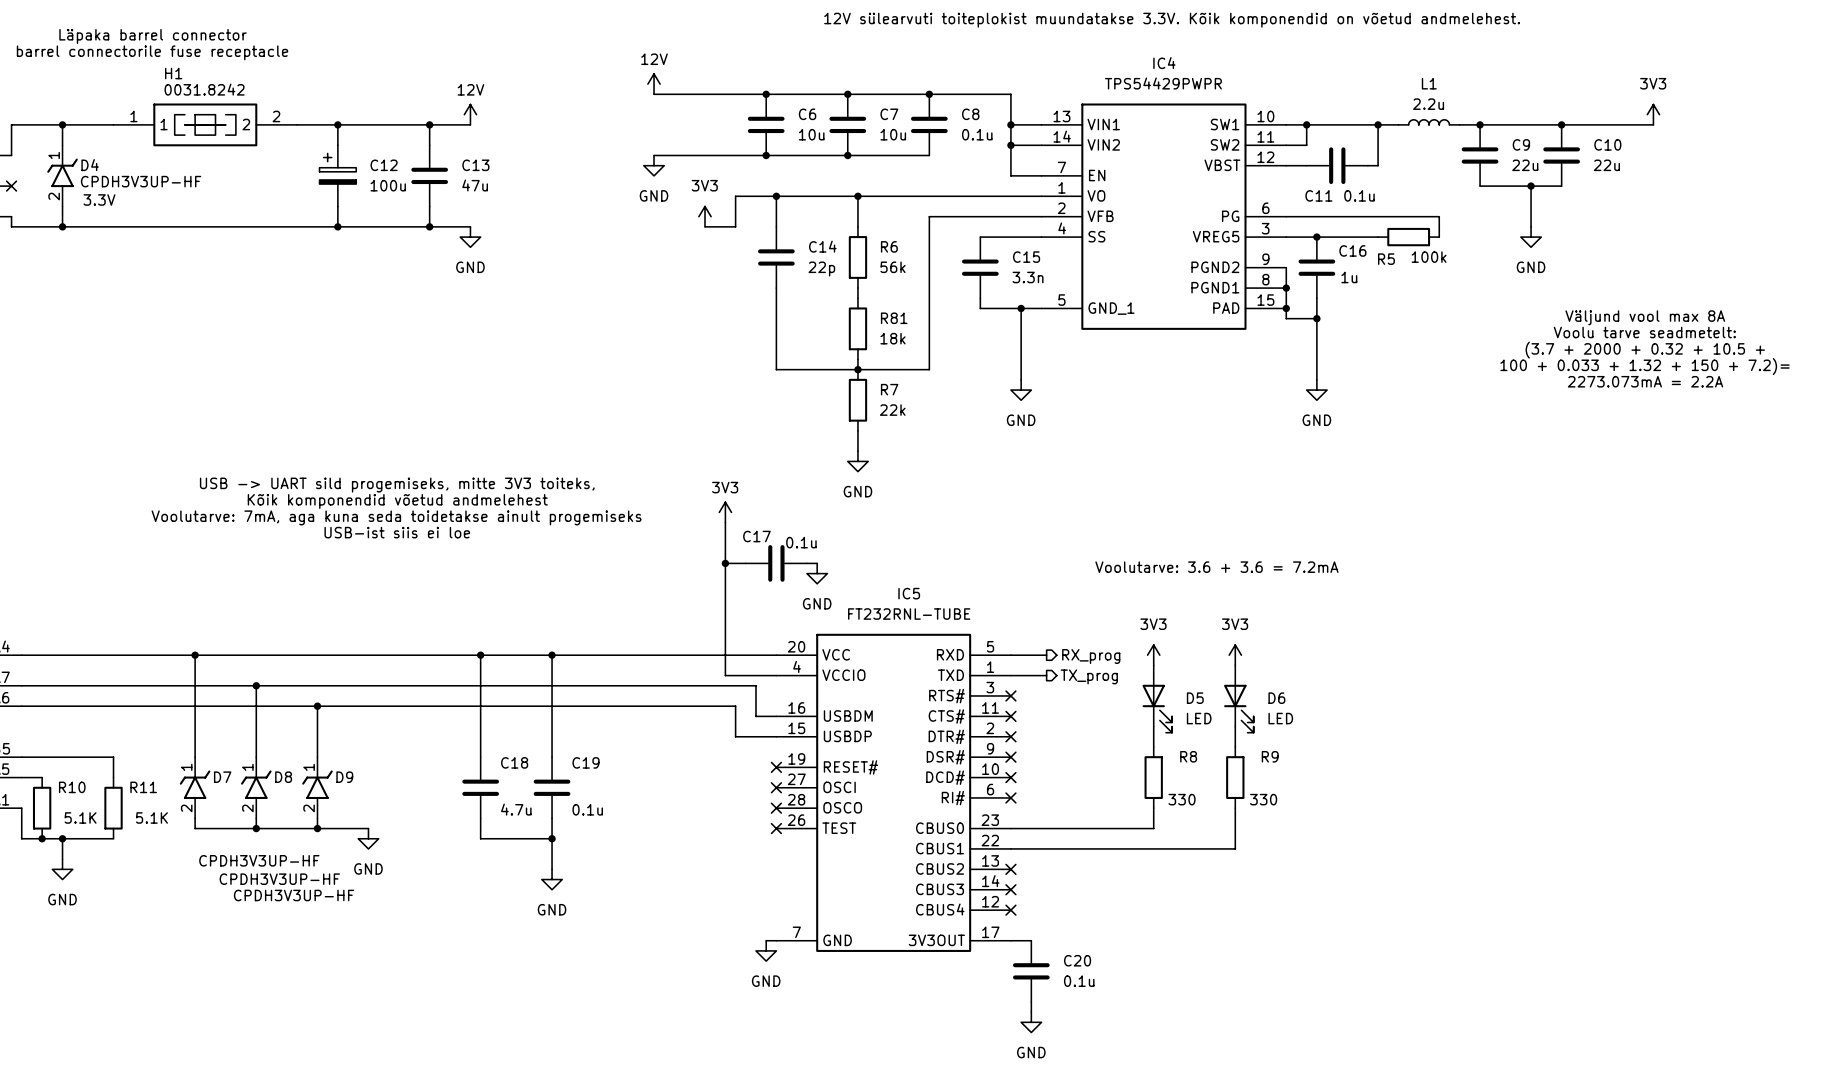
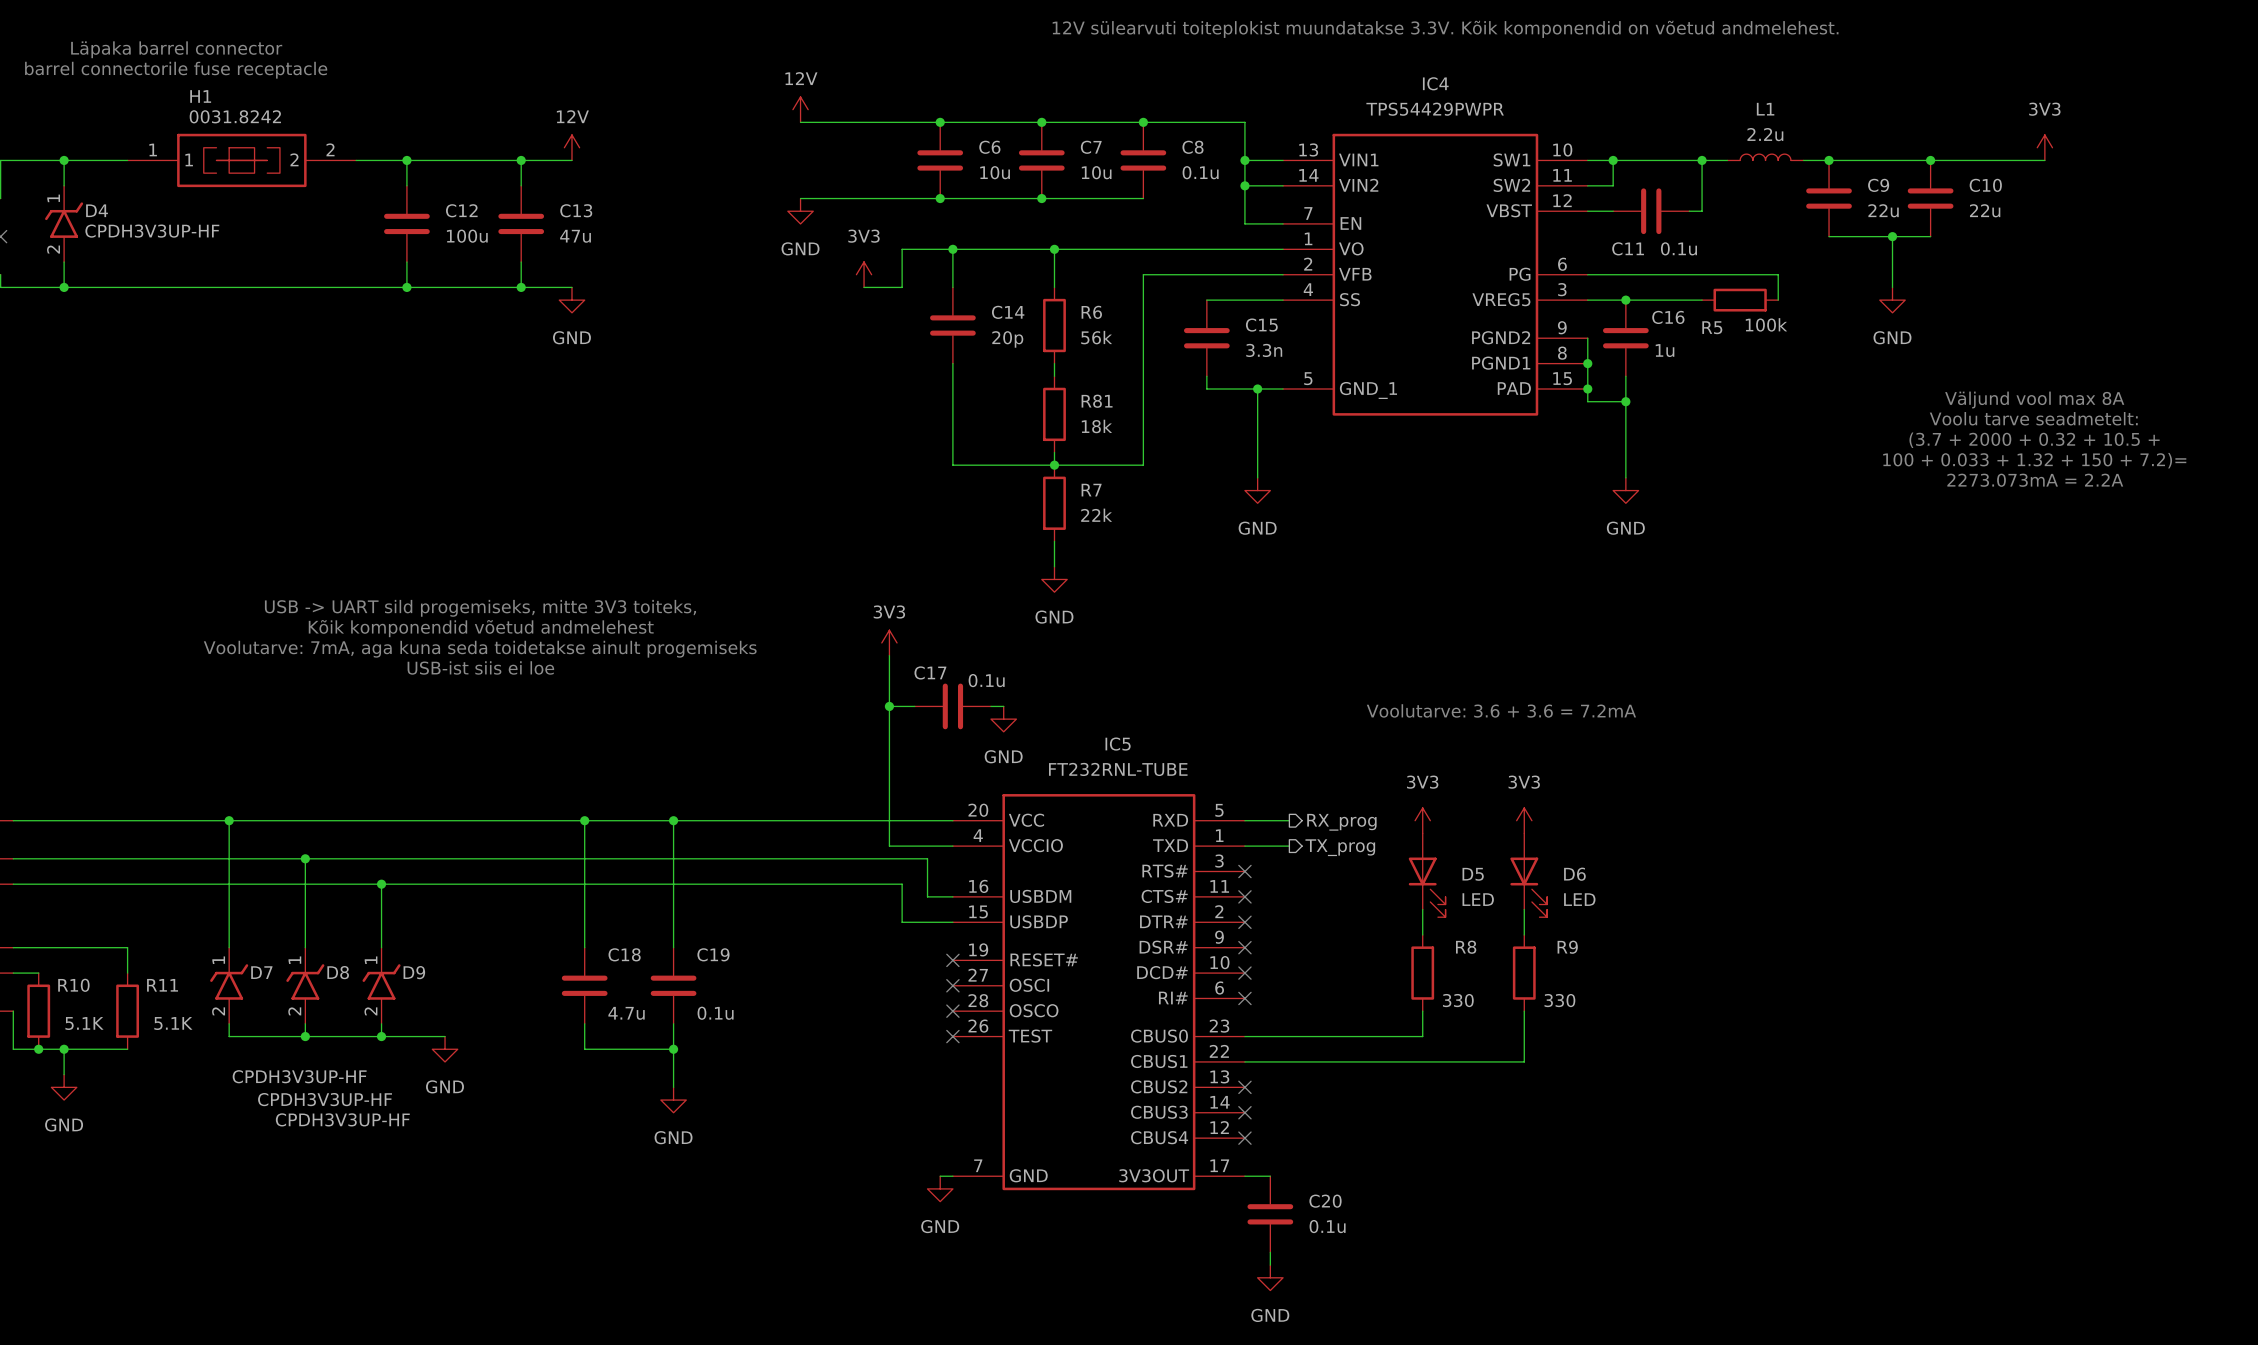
C12 symbol: [319, 145, 357, 207] -> [384, 185, 430, 263]
D4 text: 3.3V (99, 199) -> none
C14 value: 22p (821, 268) -> 20p (1007, 339)

